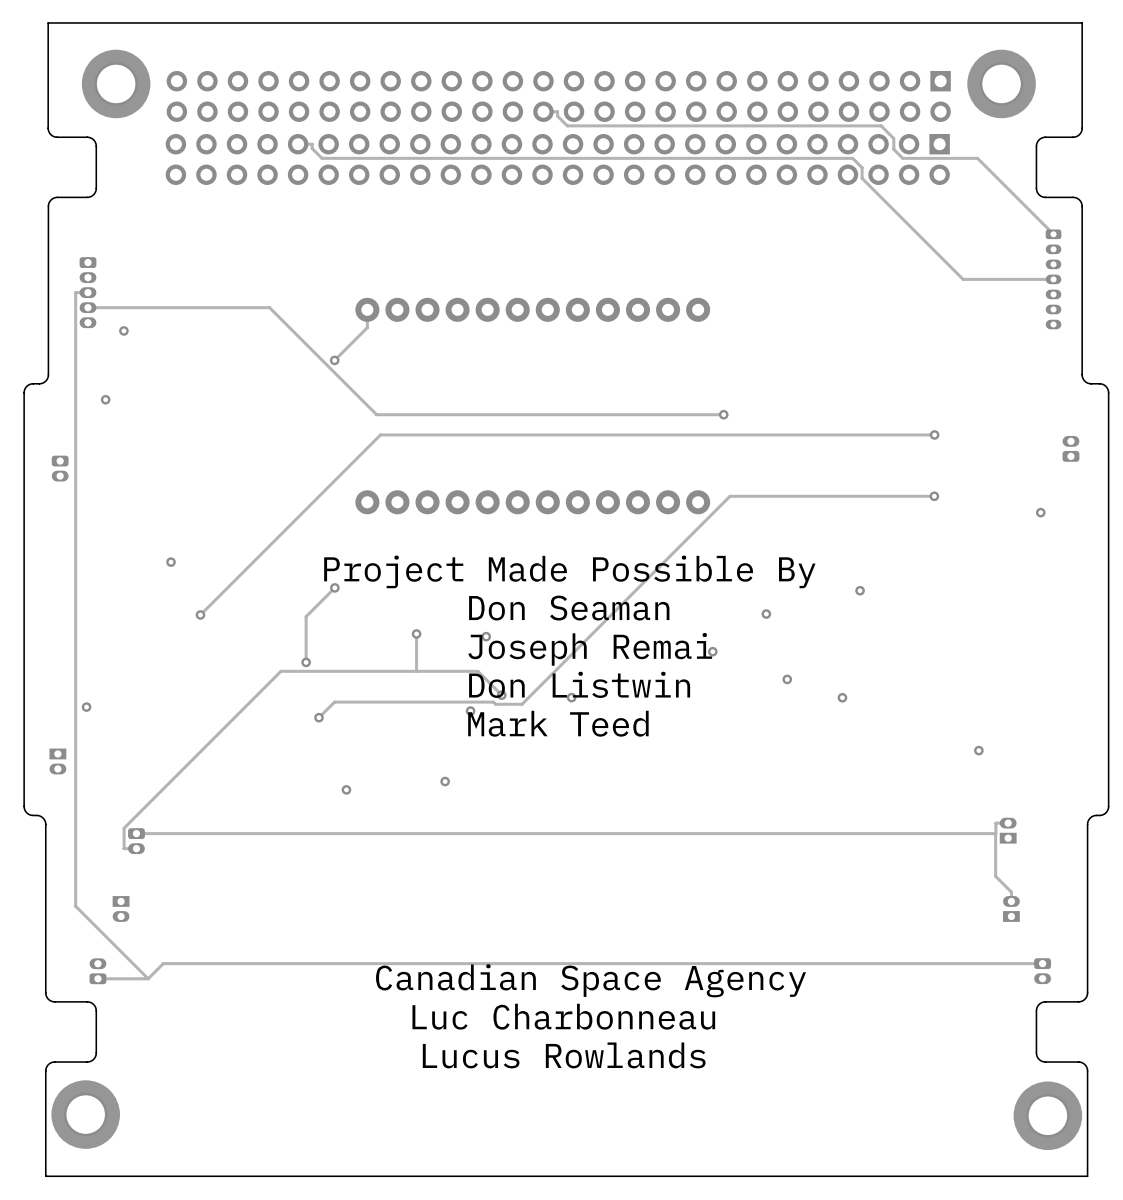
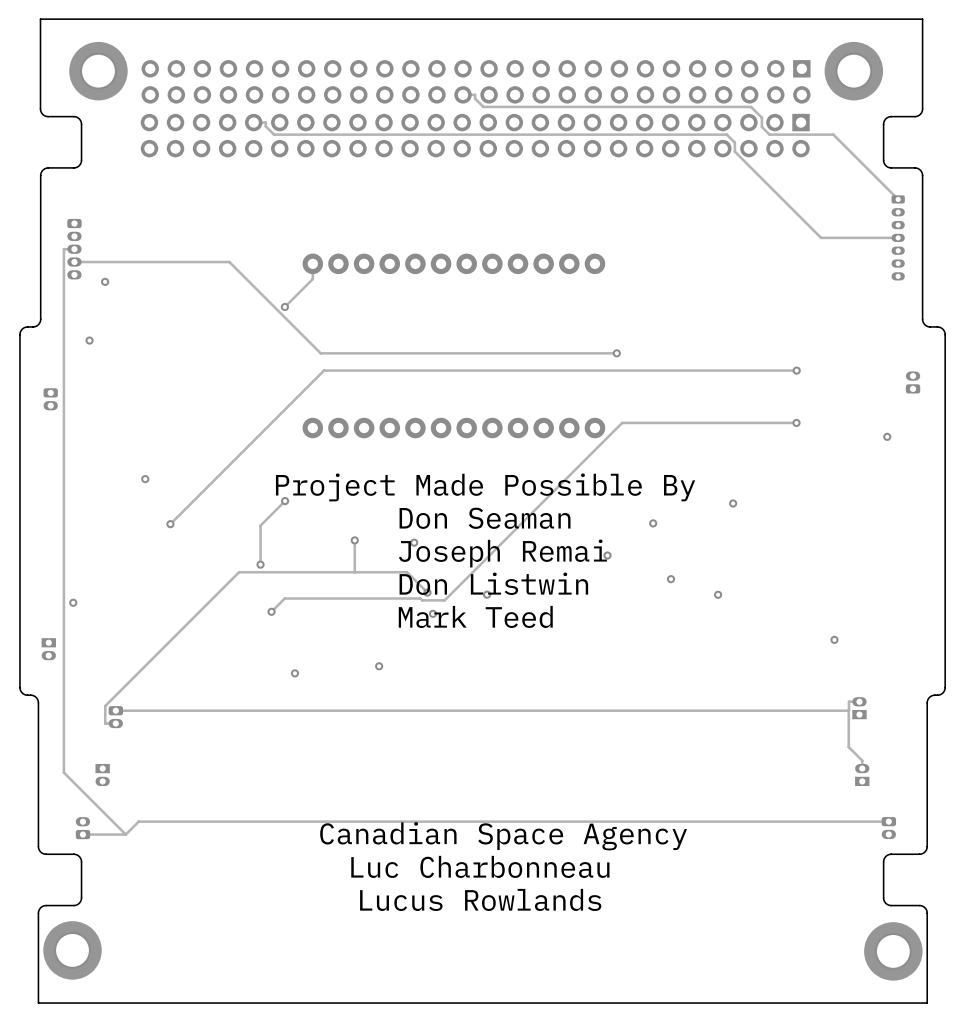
via position: (470, 711) -> (432, 613)

